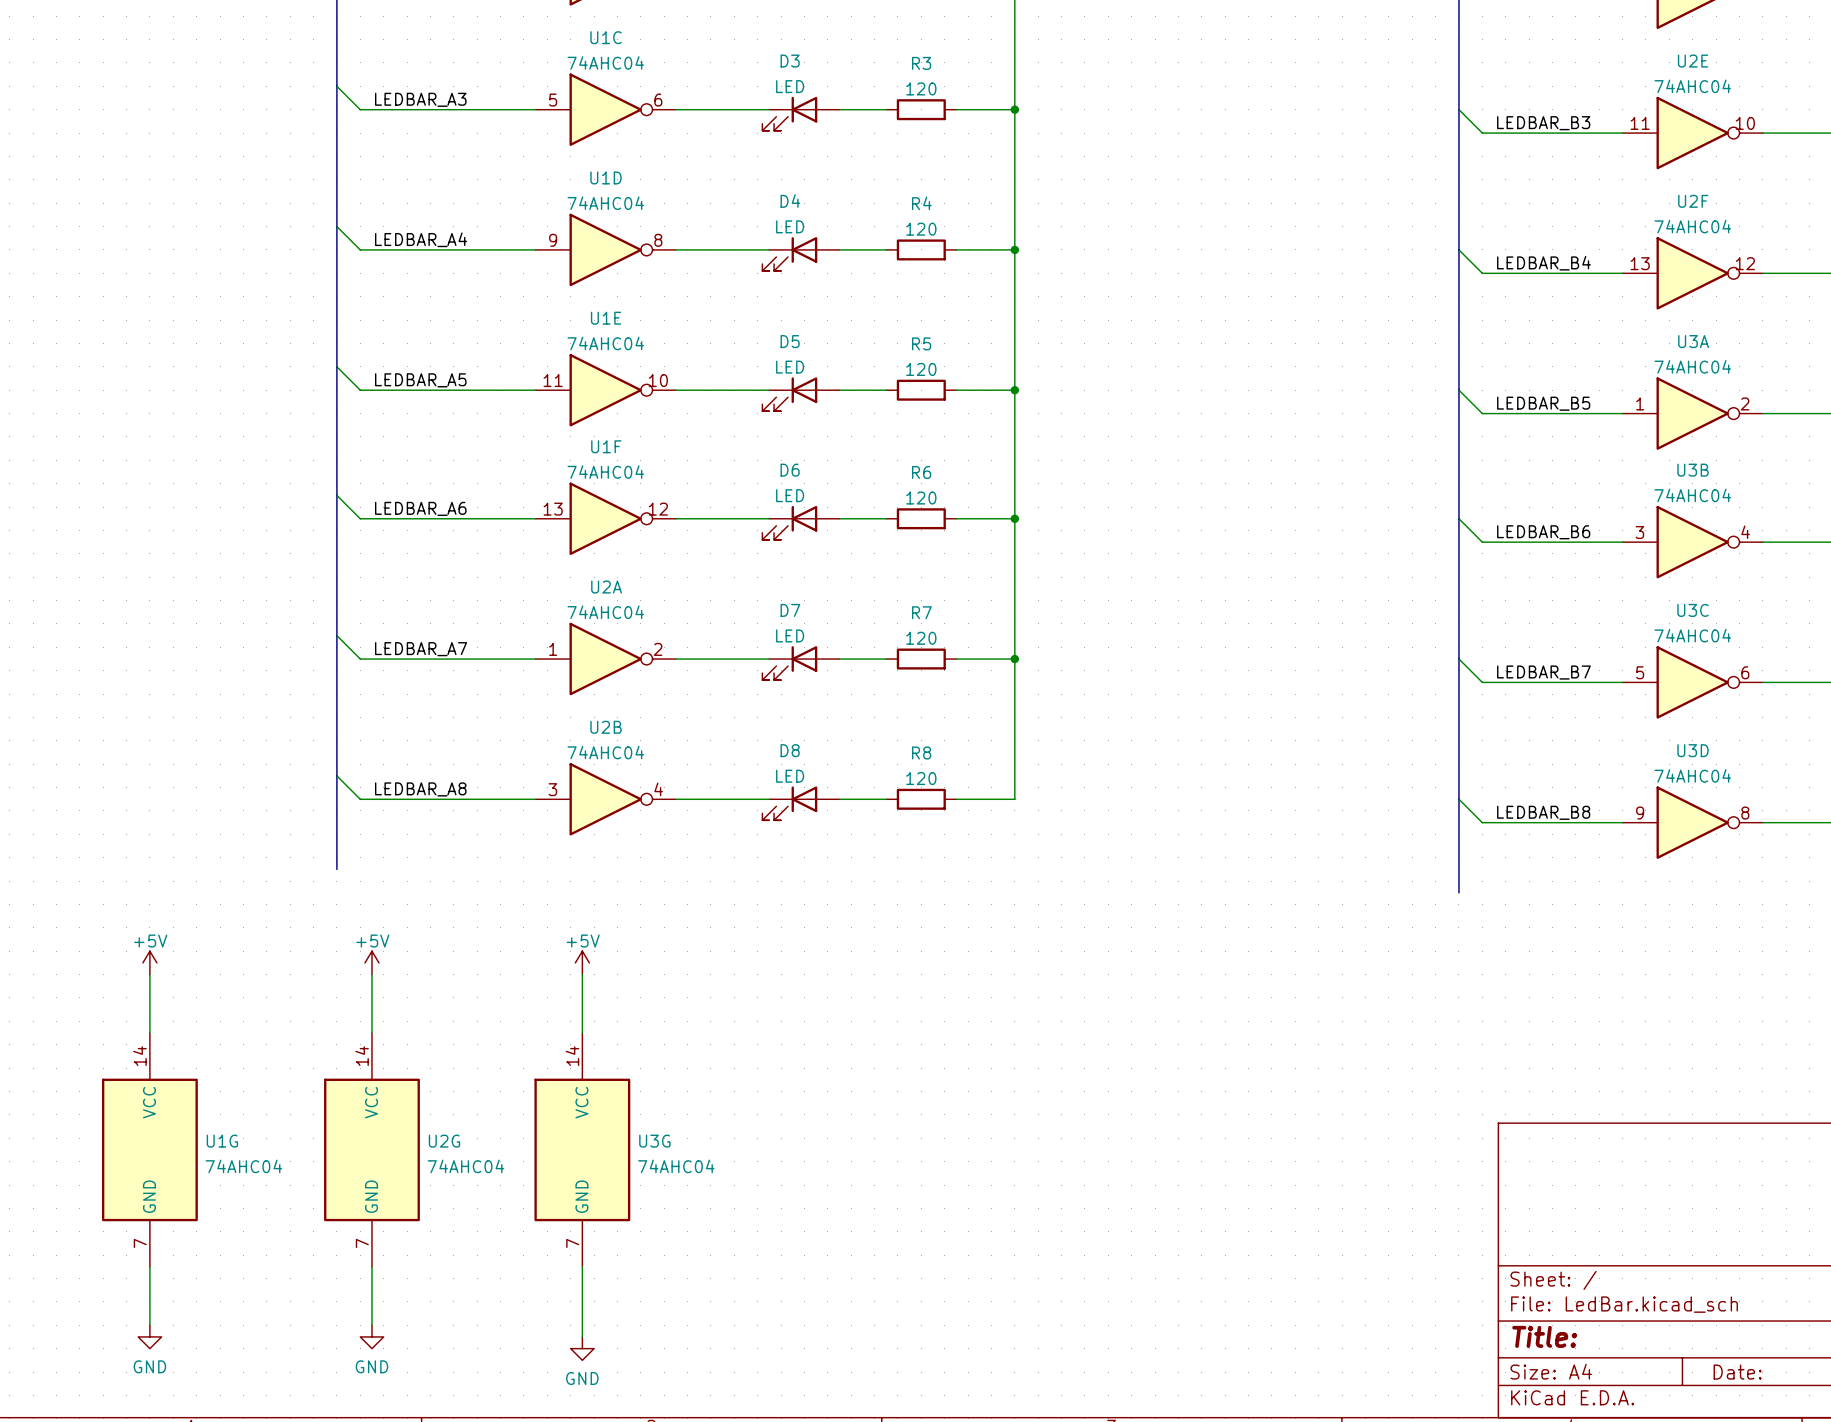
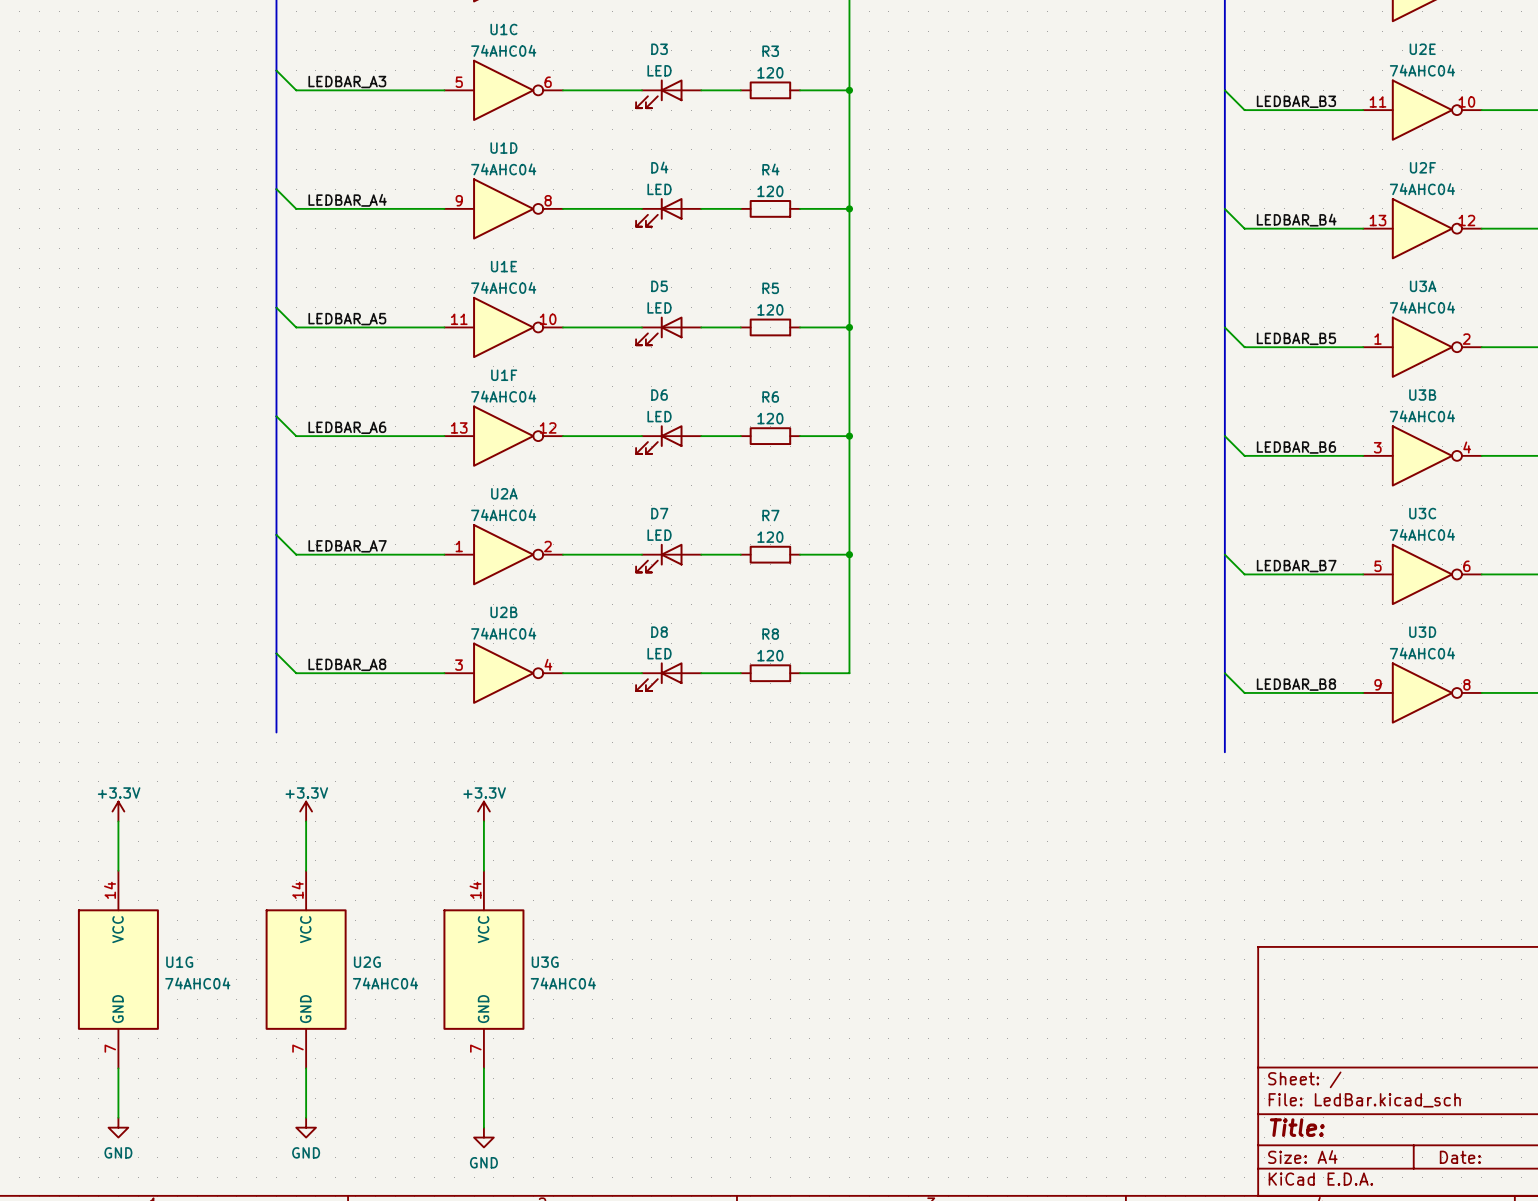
power symbol: +5V (149, 962) -> +3.3V (118, 811)
power symbol: +5V (371, 962) -> +3.3V (306, 811)
power symbol: +5V (582, 962) -> +3.3V (483, 811)

